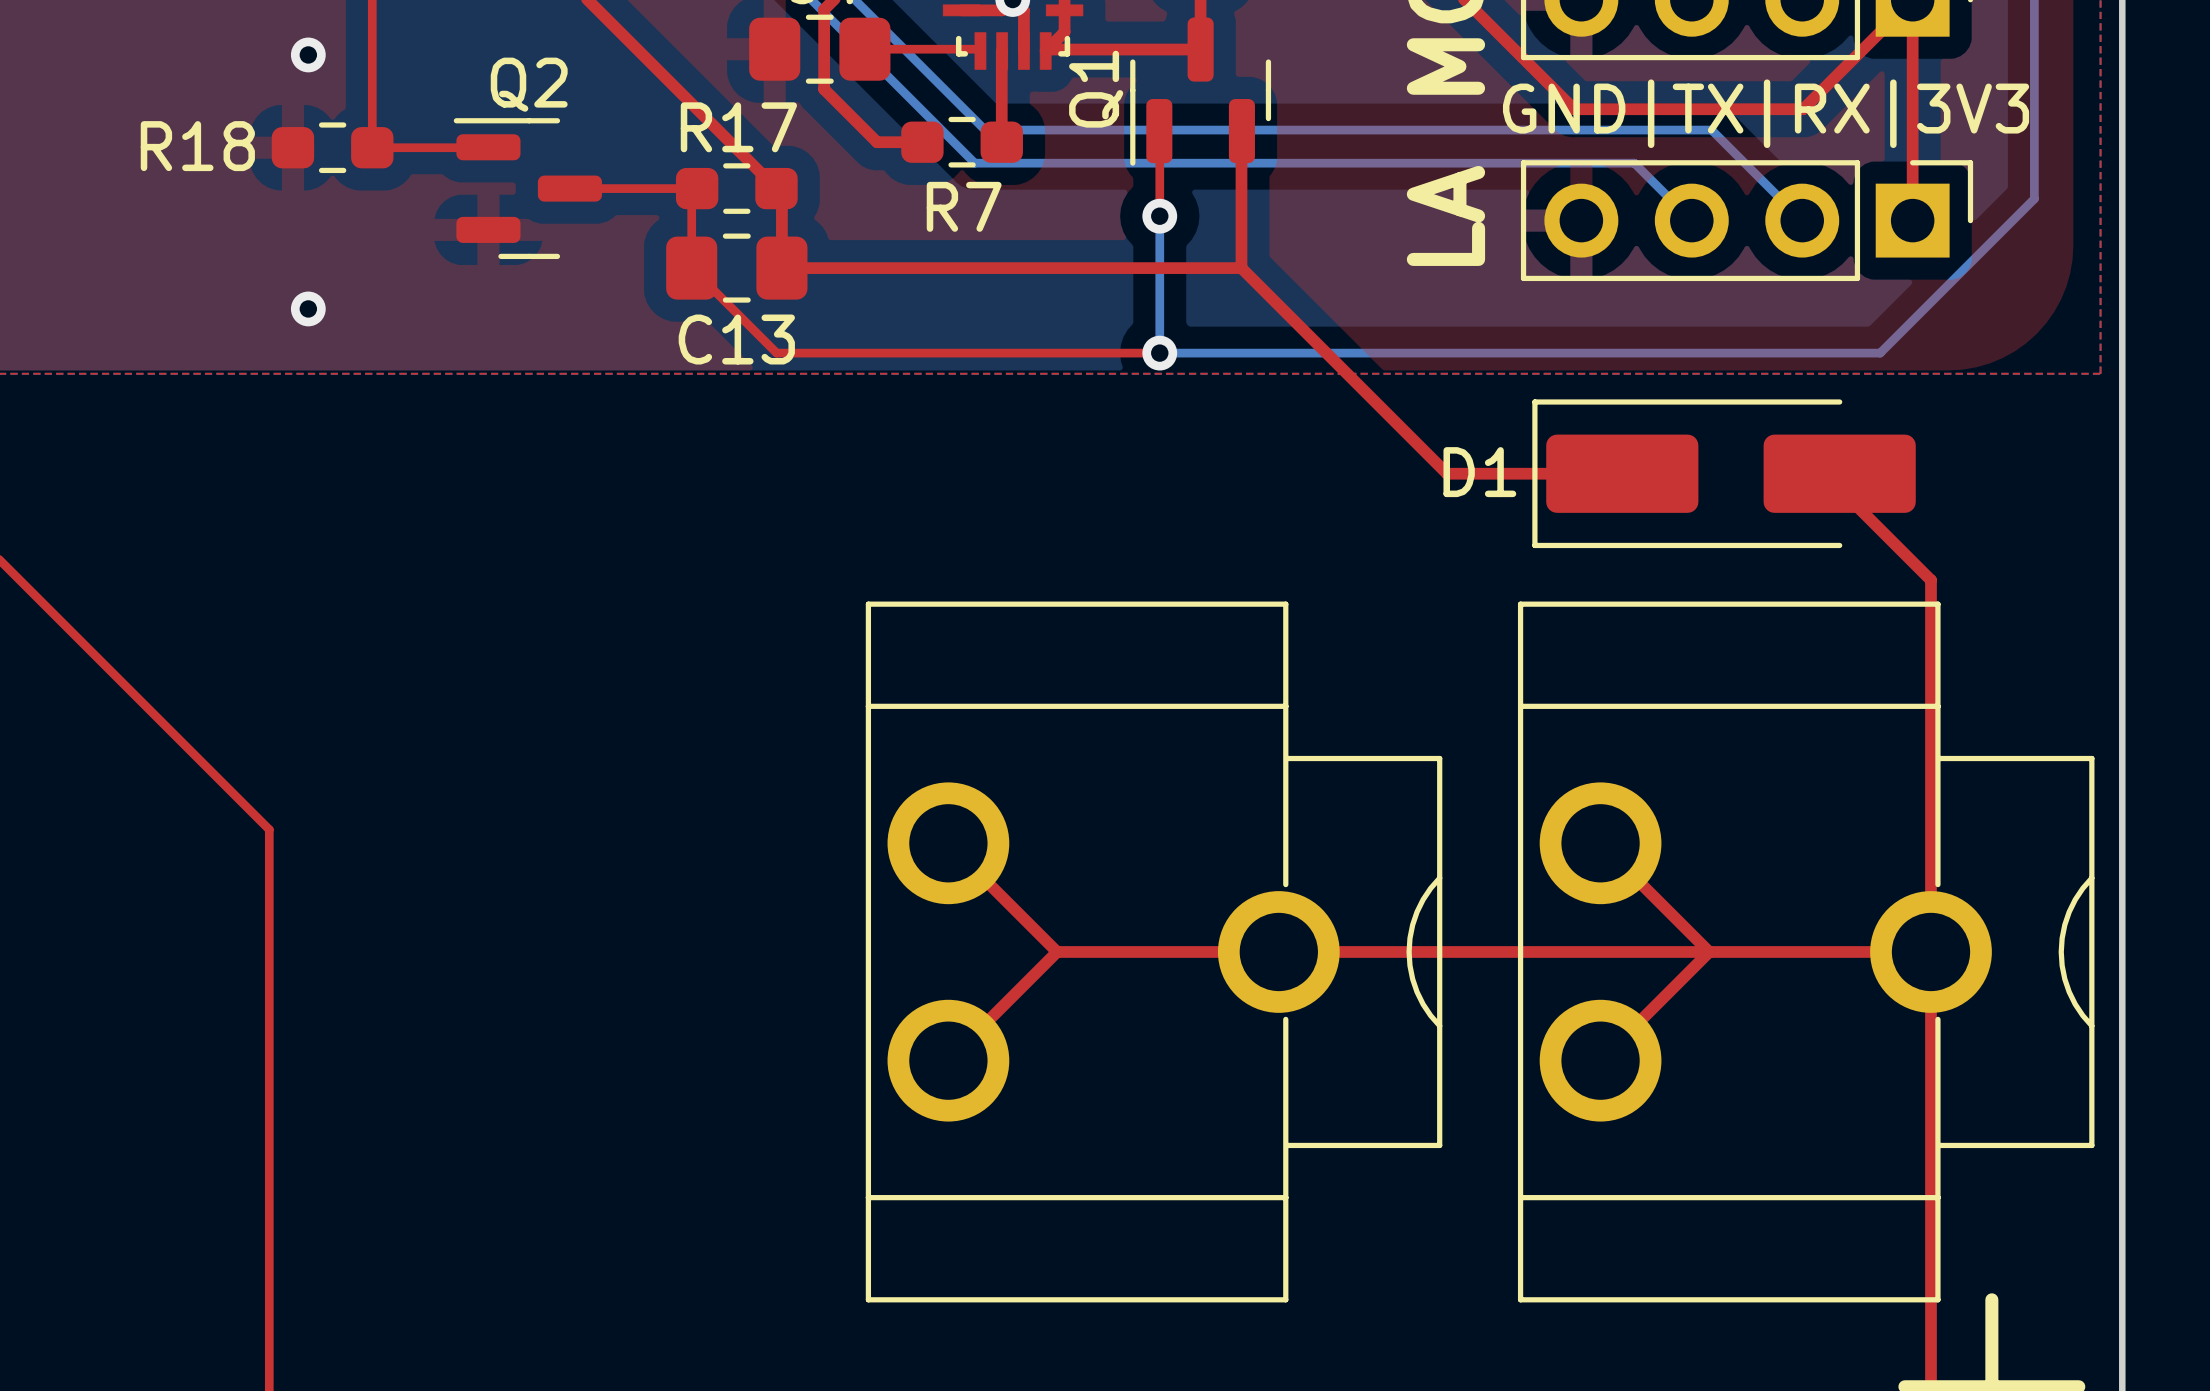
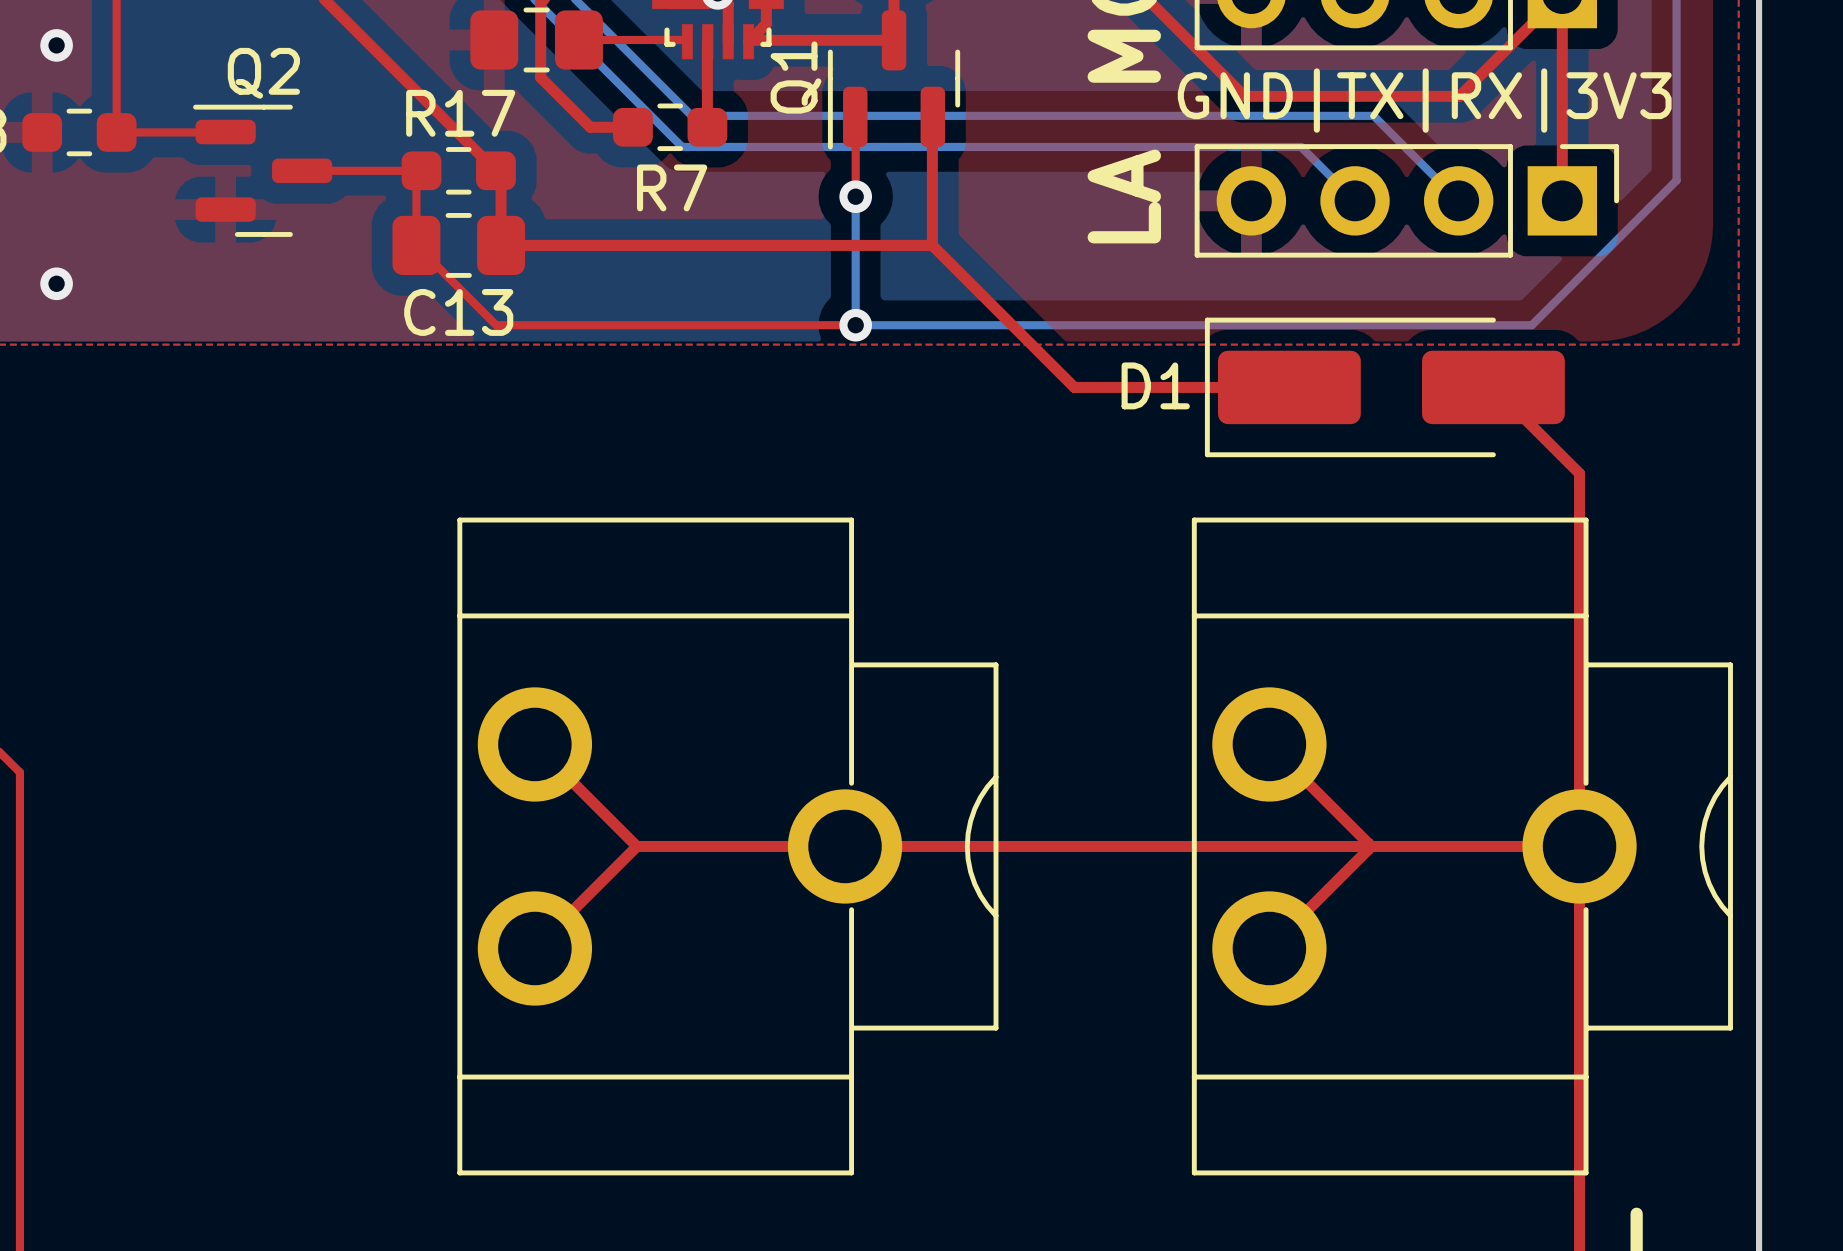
top track: (1392, 419) (1447, 473) (1622, 473) -> (1074, 387) (1289, 387)
D1 position: (1724, 473) -> (1384, 387)
top track: (1839, 488) (1930, 580) -> (1493, 387) (1579, 473) (1579, 538)
top track: none -> (1269, 744) (1371, 846)
top track: (948, 843) (1057, 951) -> (534, 744) (636, 846)
top track: (1600, 843) (1709, 951) (1600, 1060) -> none
top track: none -> (1368, 843) (1368, 849) (1269, 948)
top track: none -> (636, 846) (1579, 846)
top track: (1057, 951) (948, 1060) -> (636, 846) (534, 948)
top track: (1057, 951) (1930, 951) -> none
part position: (1154, 951) -> (727, 846)
part position: (1806, 951) -> (1462, 846)

